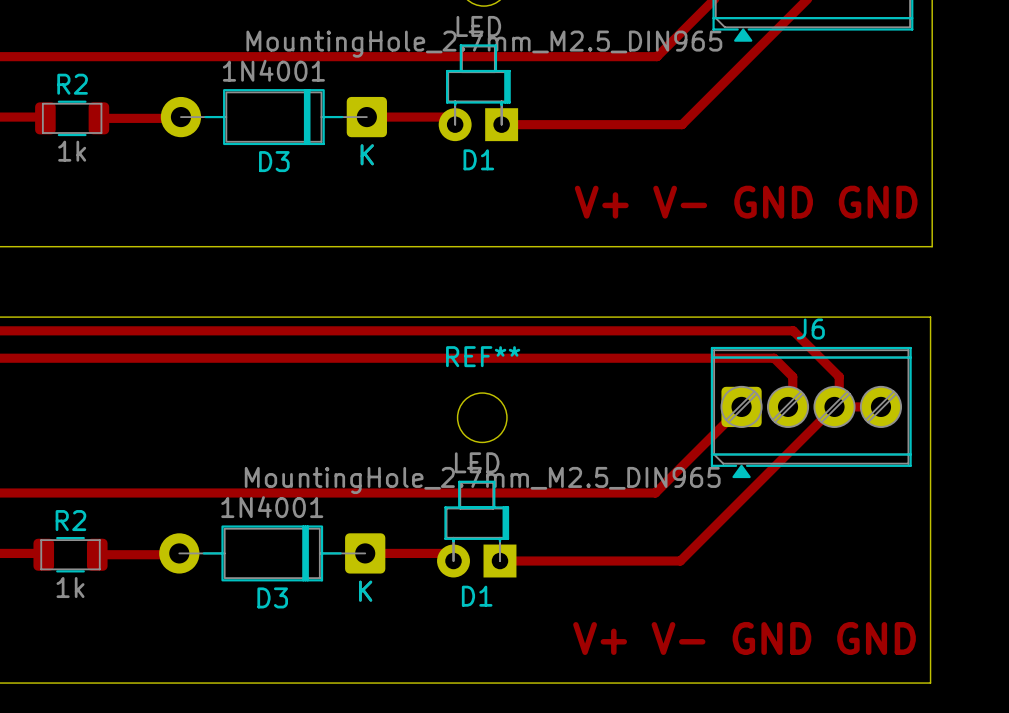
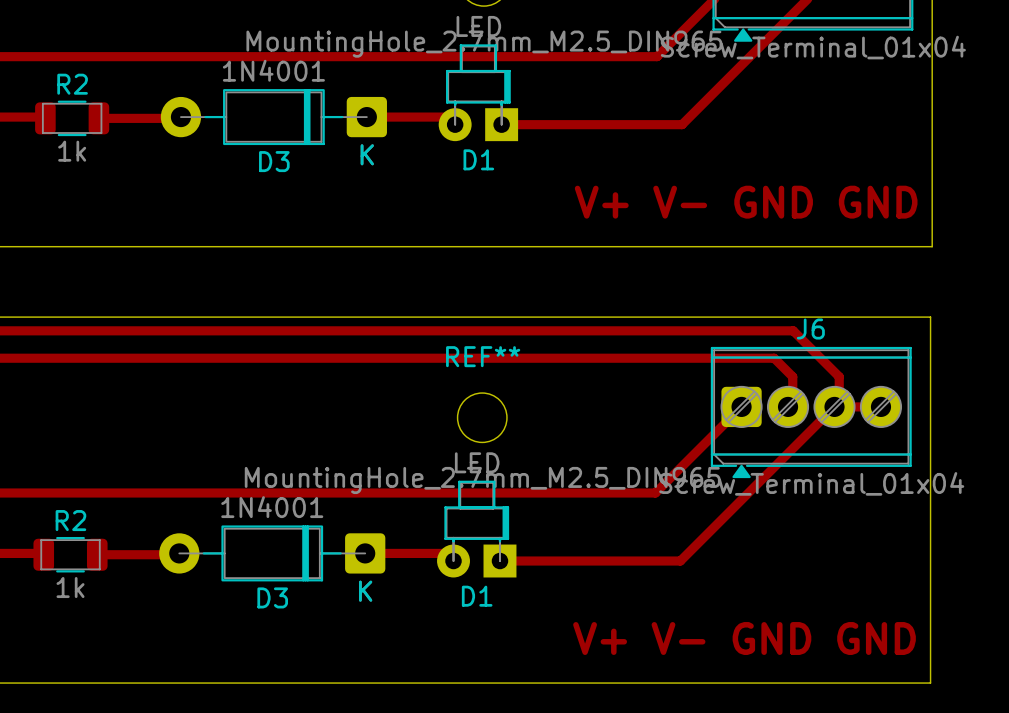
part value: none -> Screw_Terminal_01x04 (813, 47)
J6 value: none -> Screw_Terminal_01x04 (811, 483)

